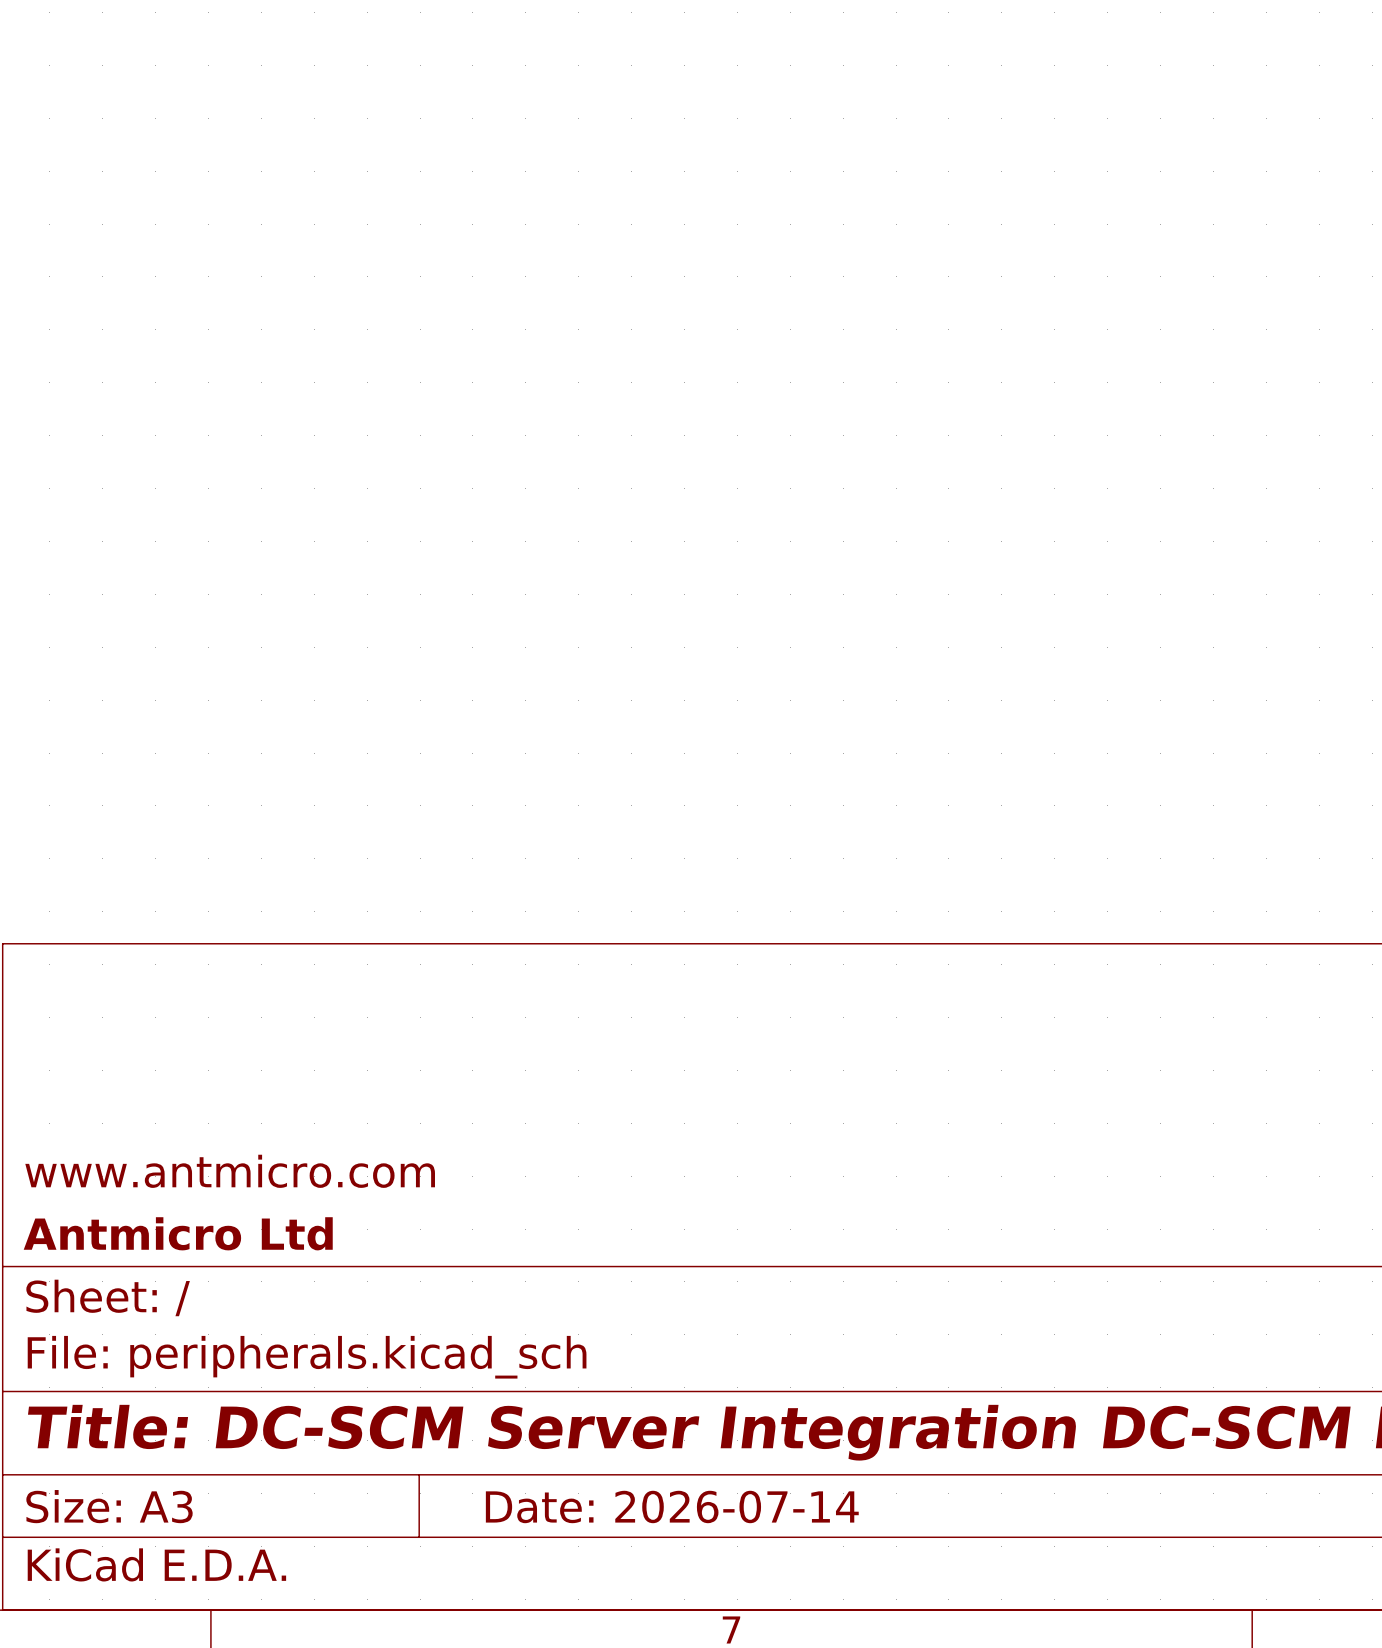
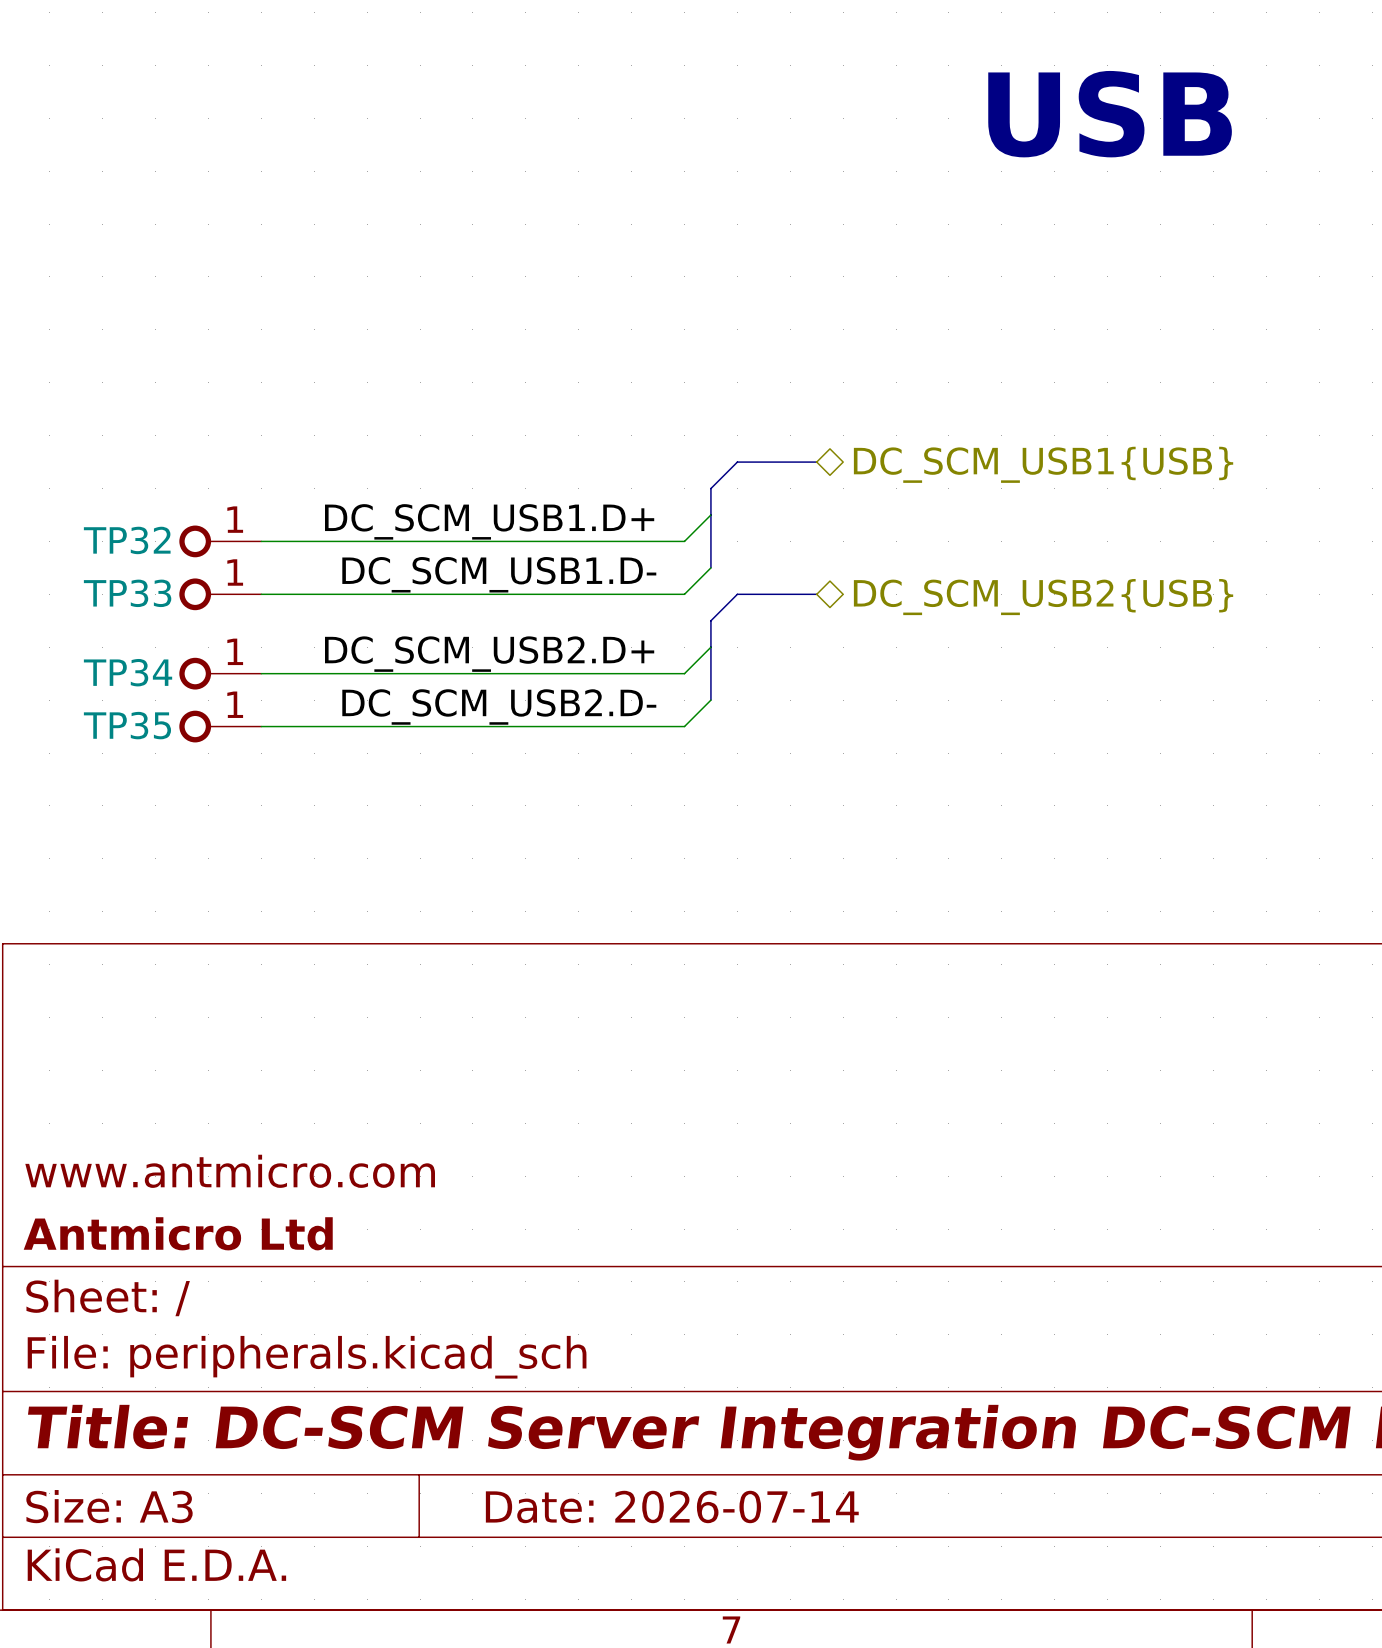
text: none -> USB (1110, 114)
bus: none -> (816, 462) (737, 462) (710, 488) (710, 567)
hierarchical label: none -> DC_SCM_USB1{USB} (1043, 464)
wire: none -> (710, 514) (684, 541) (261, 541)
label: none -> DC_SCM_USB1.D+ (489, 521)
TP32: none -> (220, 541)
wire: none -> (710, 567) (684, 594) (261, 594)
label: none -> DC_SCM_USB1.D- (499, 574)
TP33: none -> (220, 594)
bus: none -> (816, 594) (737, 594) (710, 620) (710, 700)
hierarchical label: none -> DC_SCM_USB2{USB} (1043, 597)
wire: none -> (710, 647) (684, 673) (261, 673)
label: none -> DC_SCM_USB2.D+ (489, 654)
TP34: none -> (220, 673)
wire: none -> (710, 700) (684, 726) (261, 726)
label: none -> DC_SCM_USB2.D- (499, 706)
TP35: none -> (220, 726)

